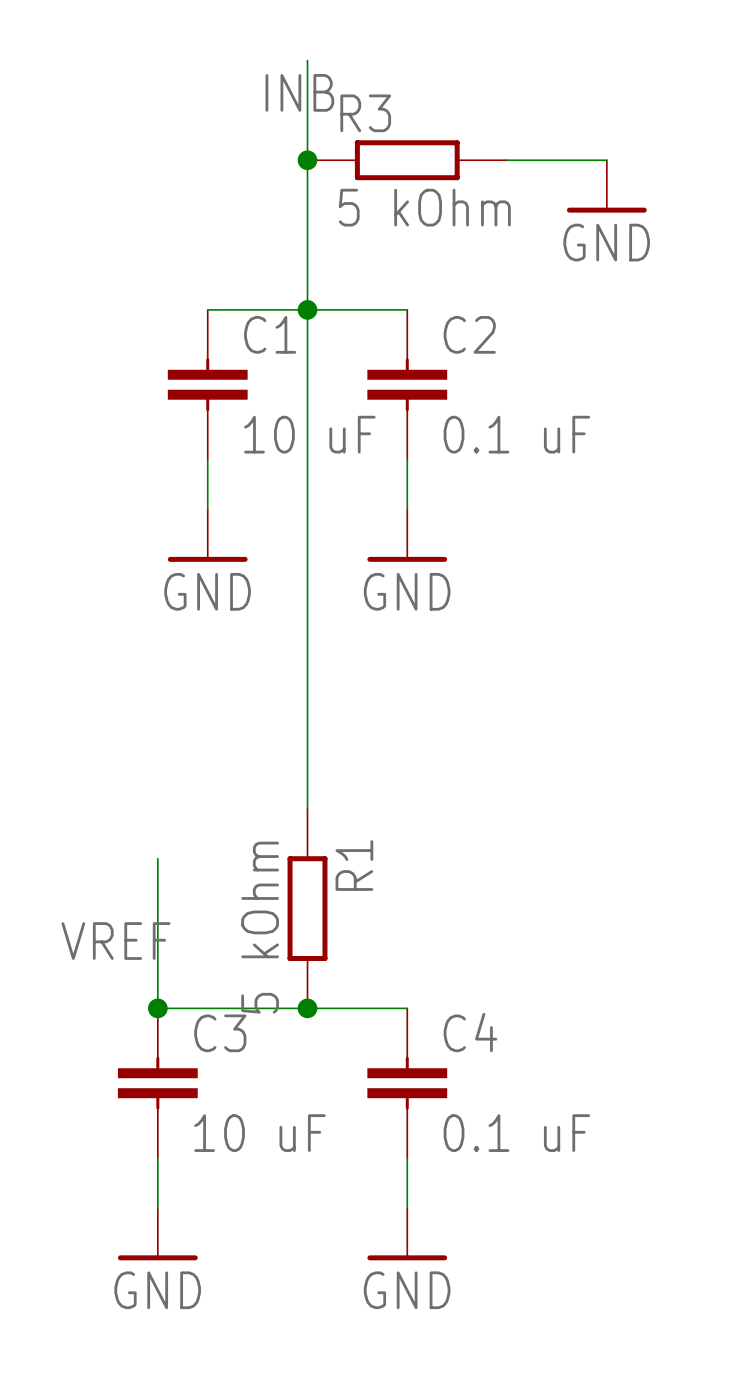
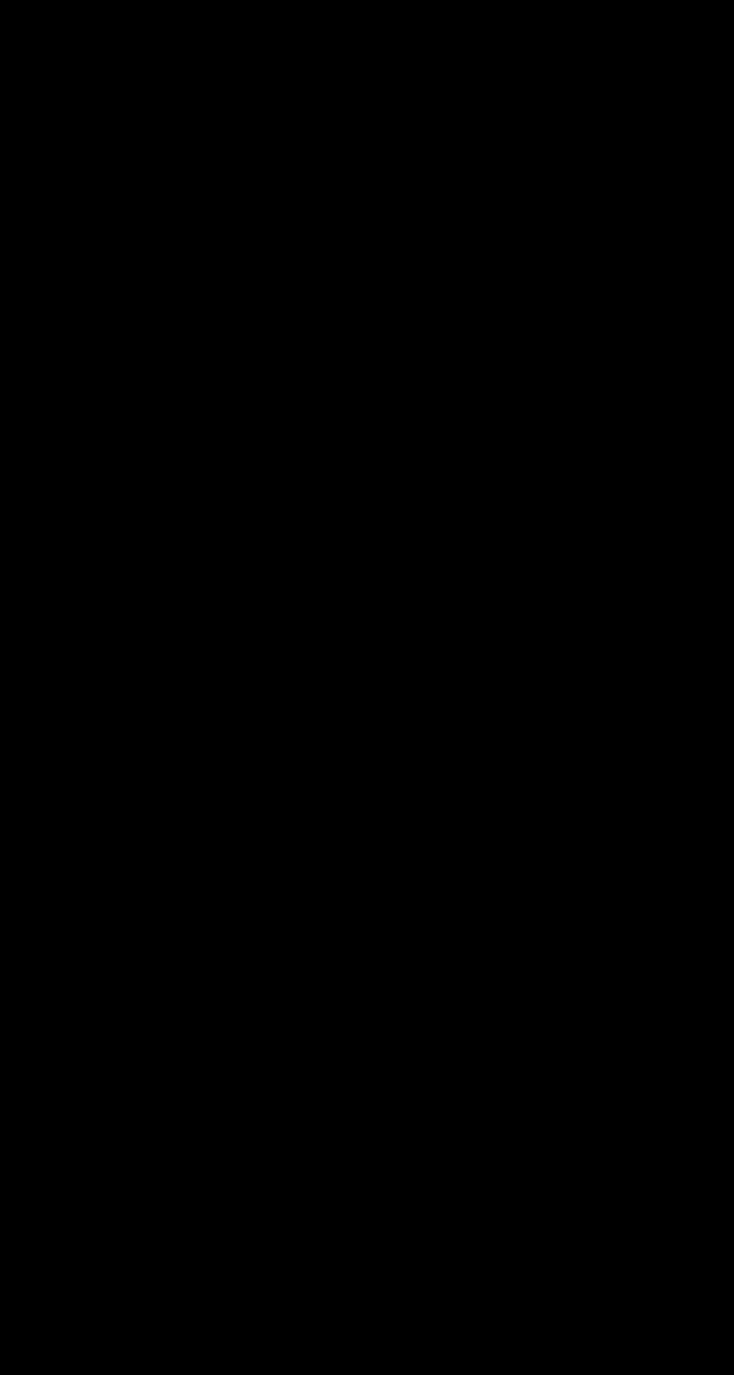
wire: (307, 60) (307, 808) -> none
label: INB (299, 92) -> none
junction: (307, 160) -> none
R3: 5 kOhm (407, 160) -> none
wire: (507, 160) (606, 160) -> none
power symbol: GND (606, 186) -> none
wire: (207, 309) (407, 309) -> none
junction: (307, 309) -> none
C1: 10 uF (207, 384) -> none
C2: 0.1 uF (407, 384) -> none
wire: (207, 459) (207, 509) -> none
wire: (407, 459) (407, 509) -> none
power symbol: GND (207, 535) -> none
power symbol: GND (407, 535) -> none
wire: (157, 858) (157, 1008) (407, 1008) -> none
R1: 5 kOhm (307, 908) -> none
label: VREF (116, 941) -> none
junction: (157, 1008) -> none
junction: (307, 1008) -> none
C3: 10 uF (157, 1083) -> none
C4: 0.1 uF (407, 1083) -> none
wire: (157, 1158) (157, 1207) -> none
wire: (407, 1158) (407, 1207) -> none
power symbol: GND (157, 1234) -> none
power symbol: GND (407, 1234) -> none

